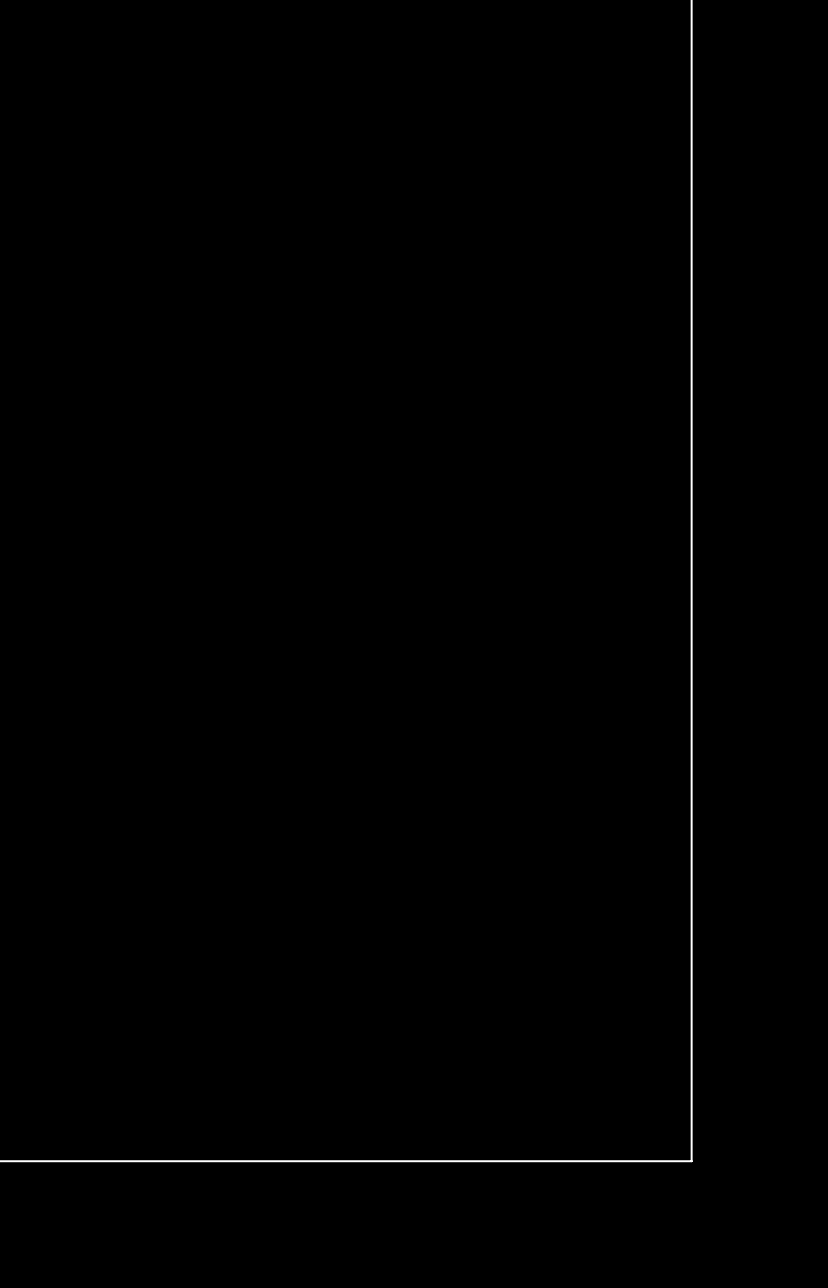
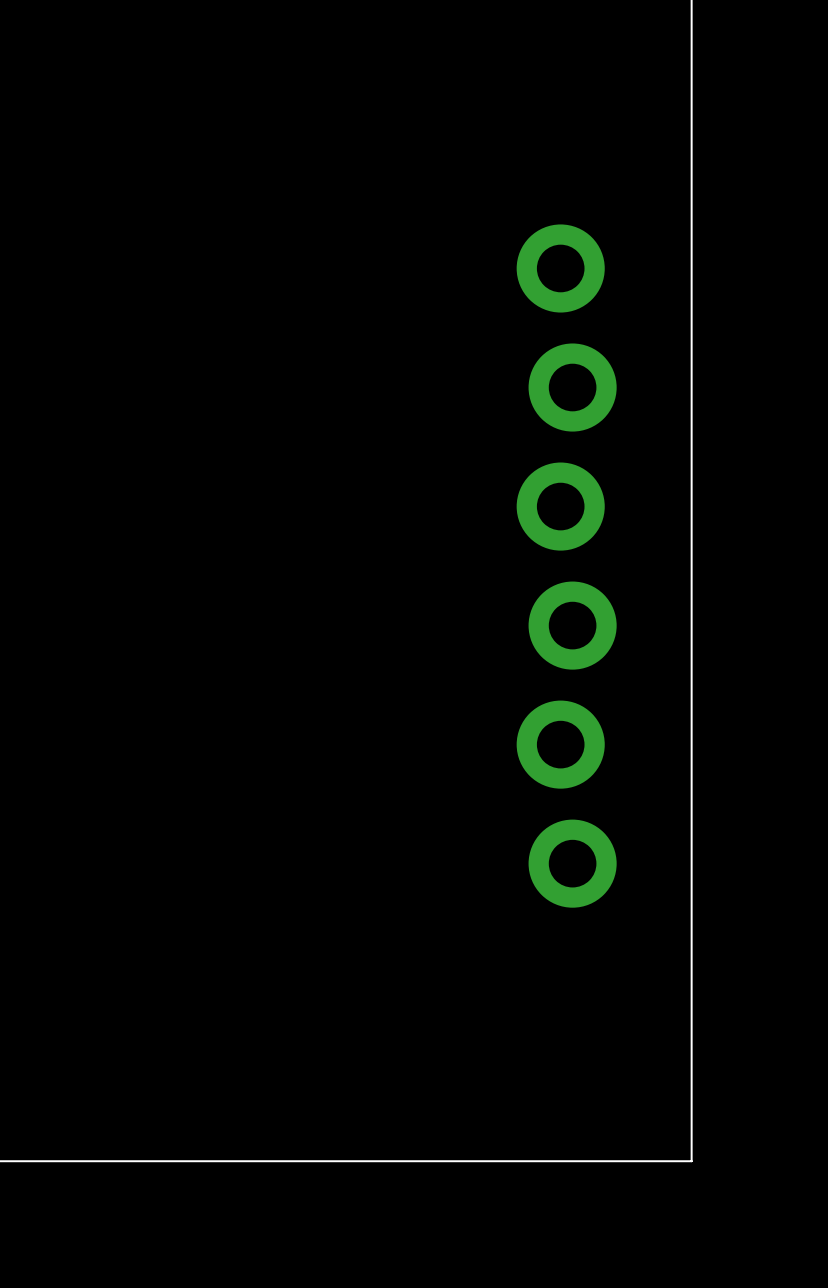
part: none -> (566, 566)

